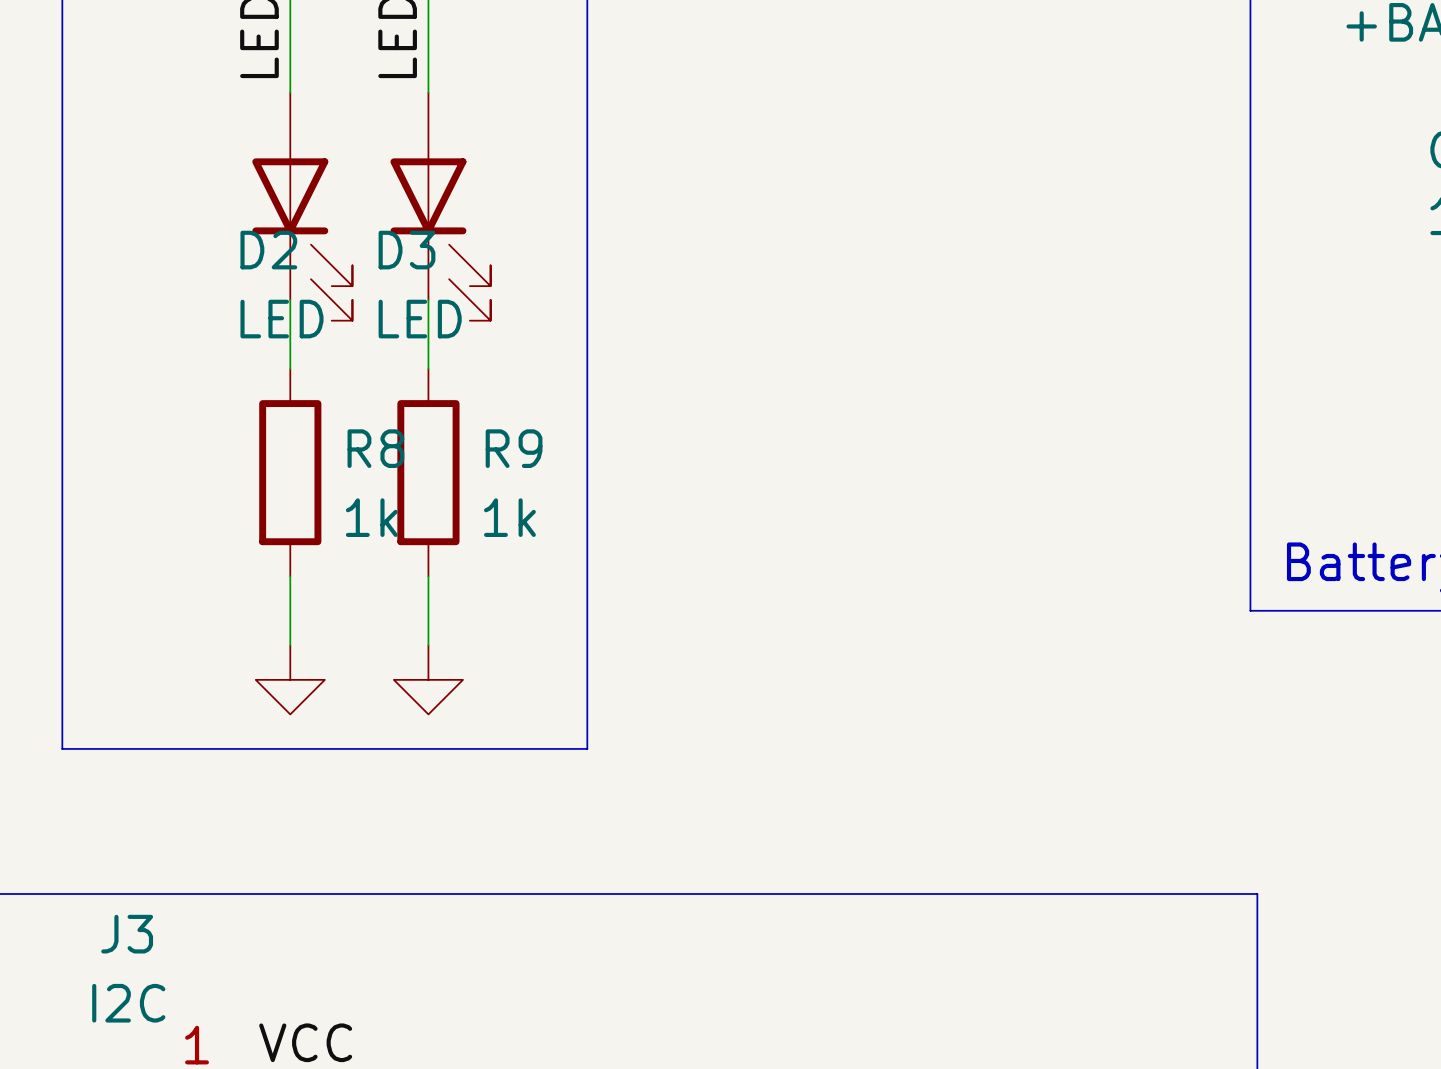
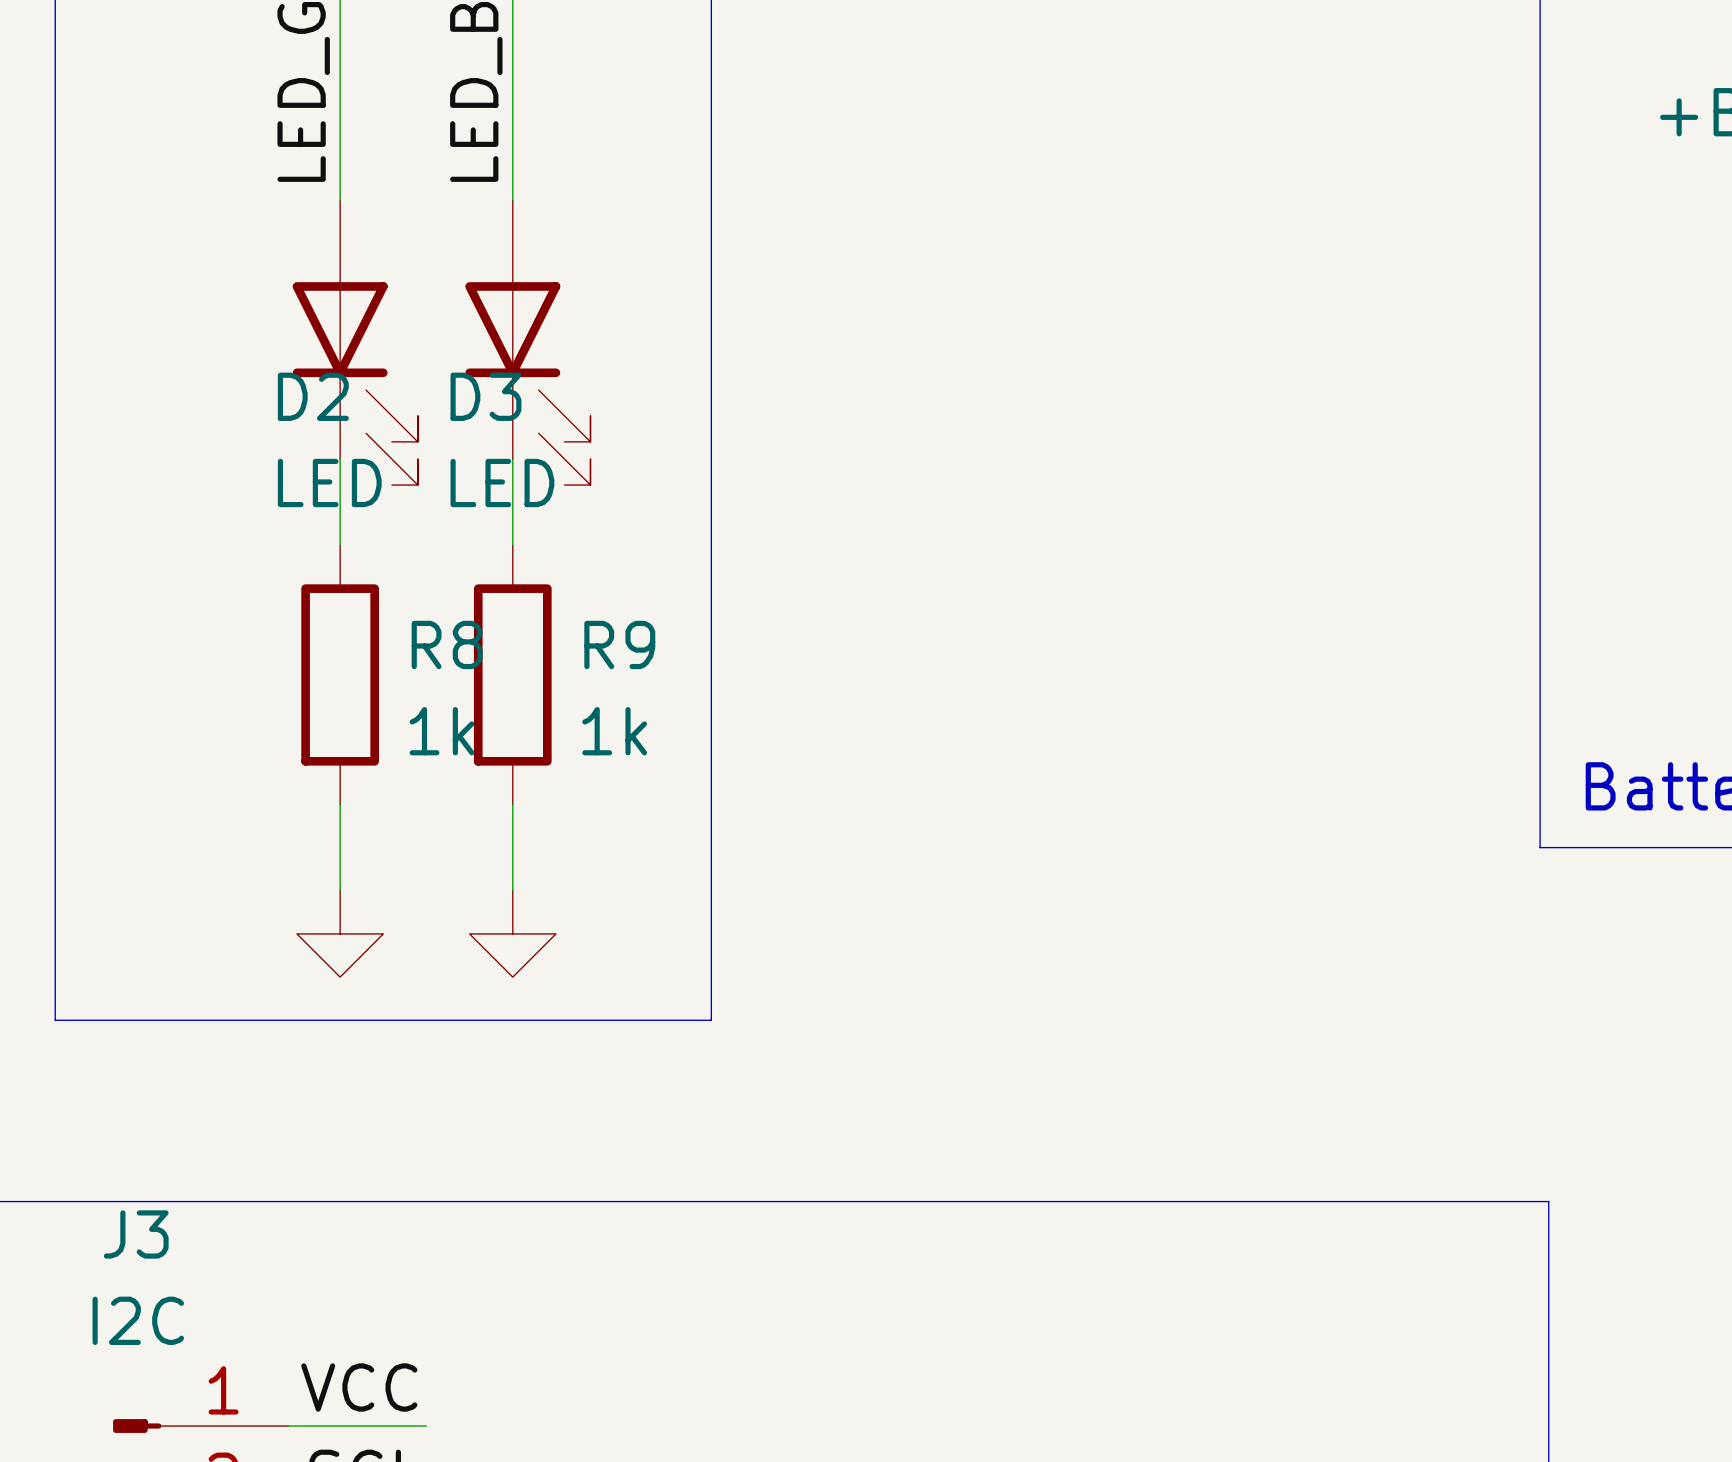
J3 name position: J3 (127, 934) -> J3 (136, 1234)
J3 value position: I2C (128, 1003) -> I2C (138, 1320)

